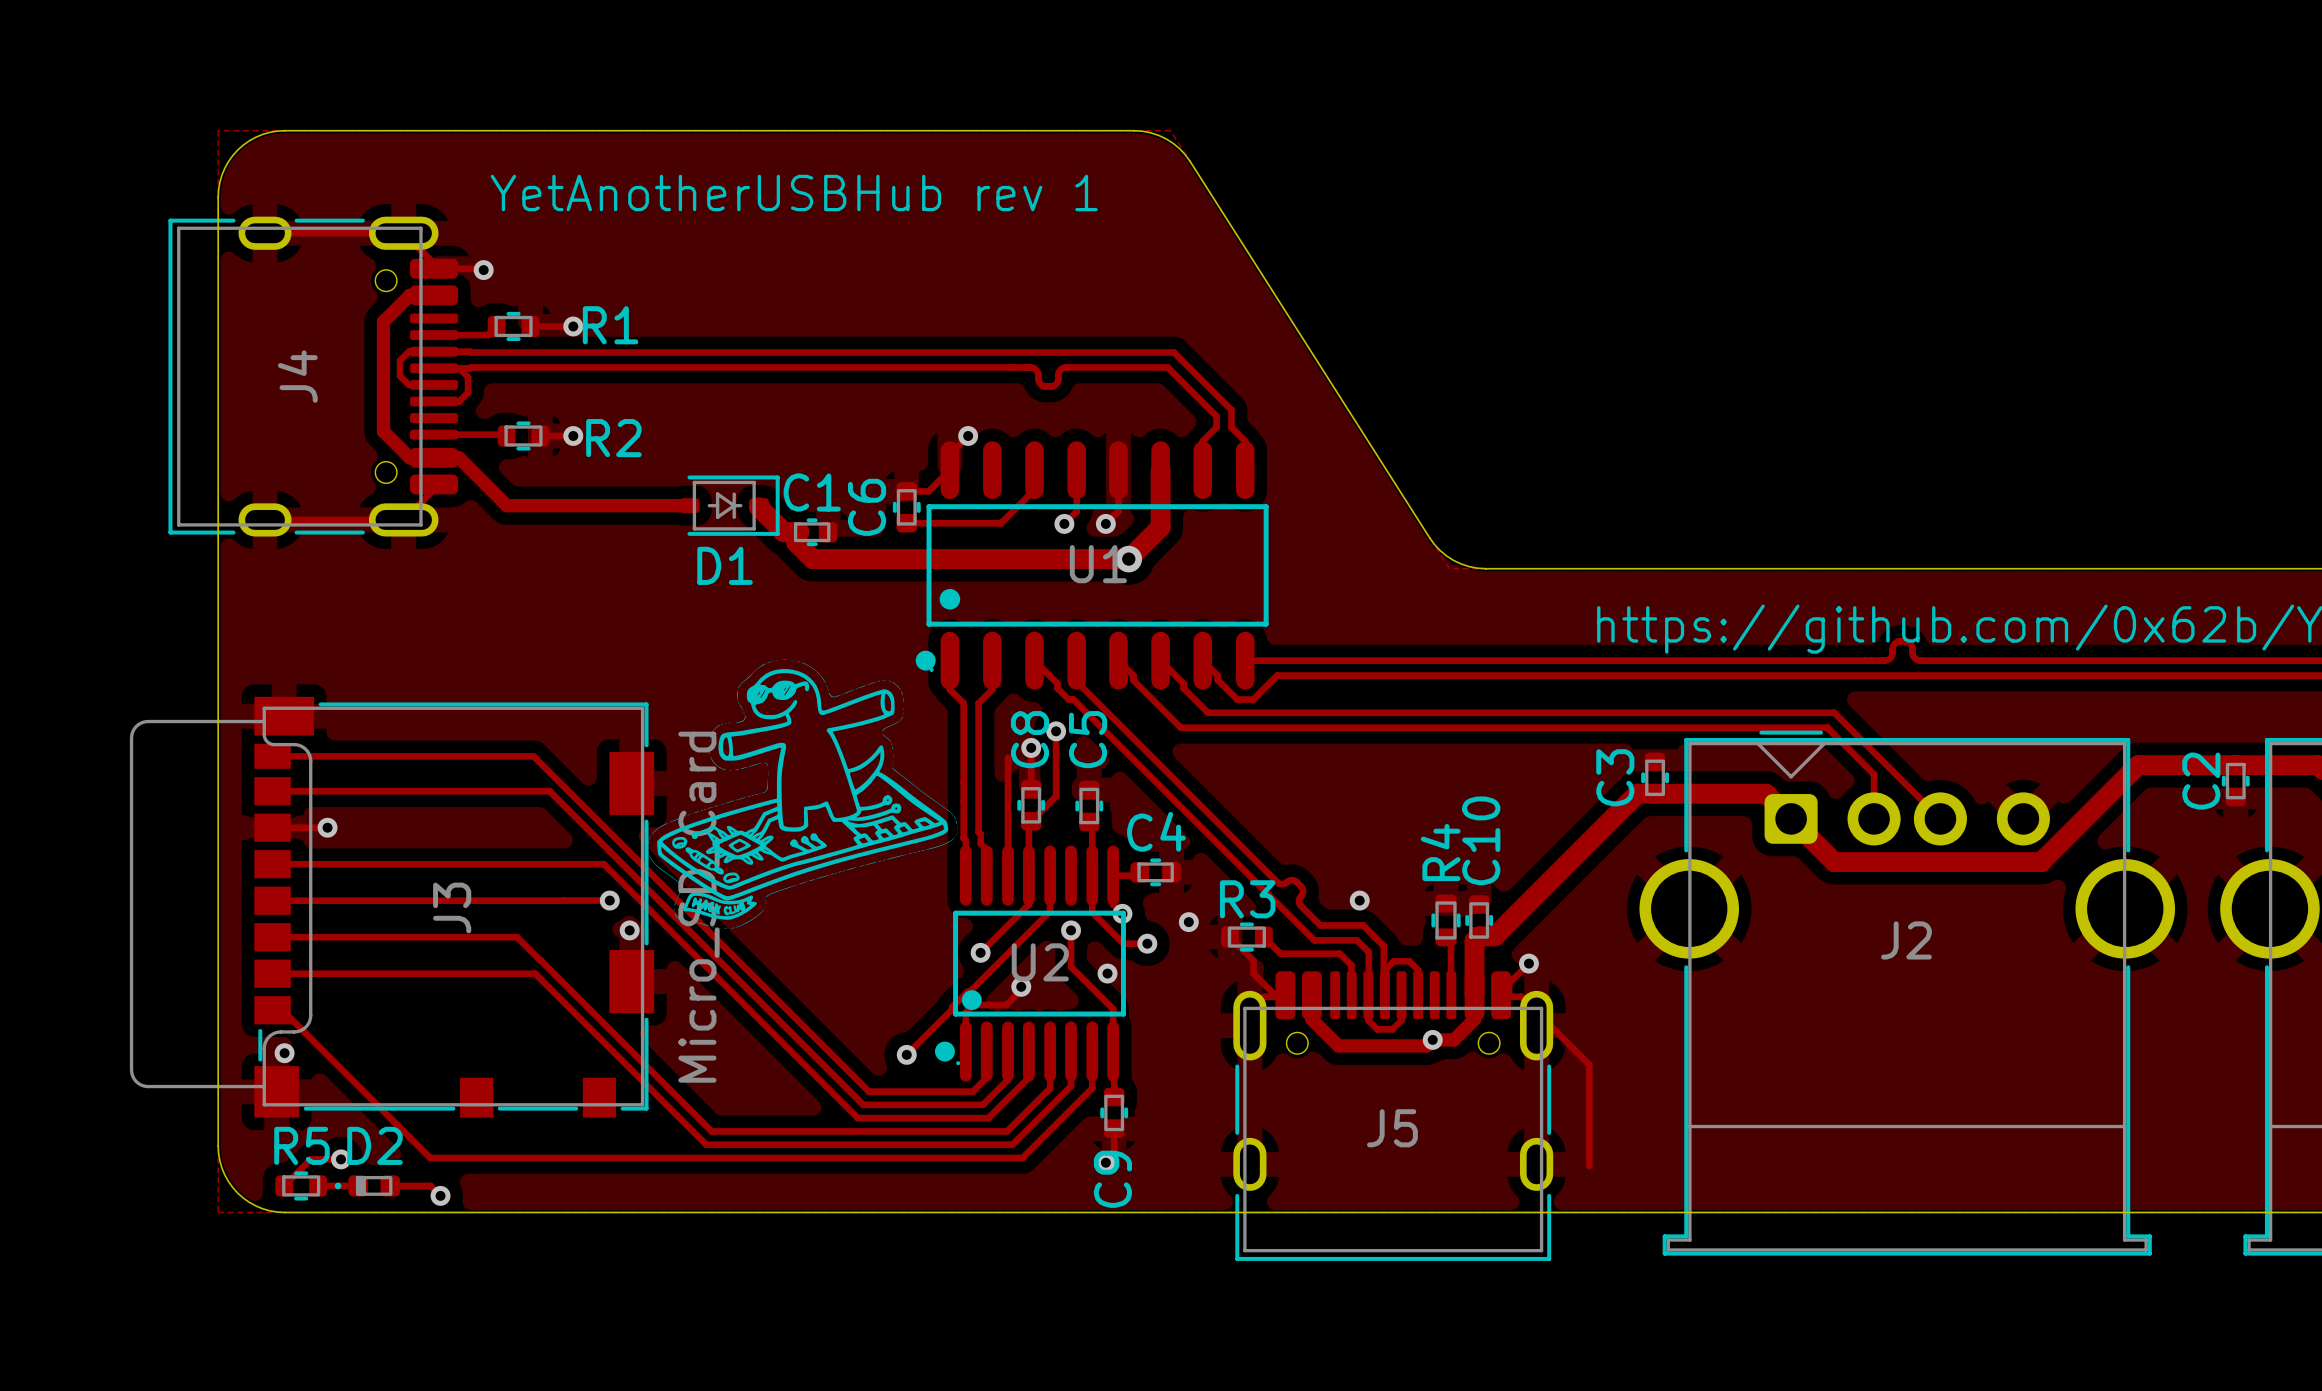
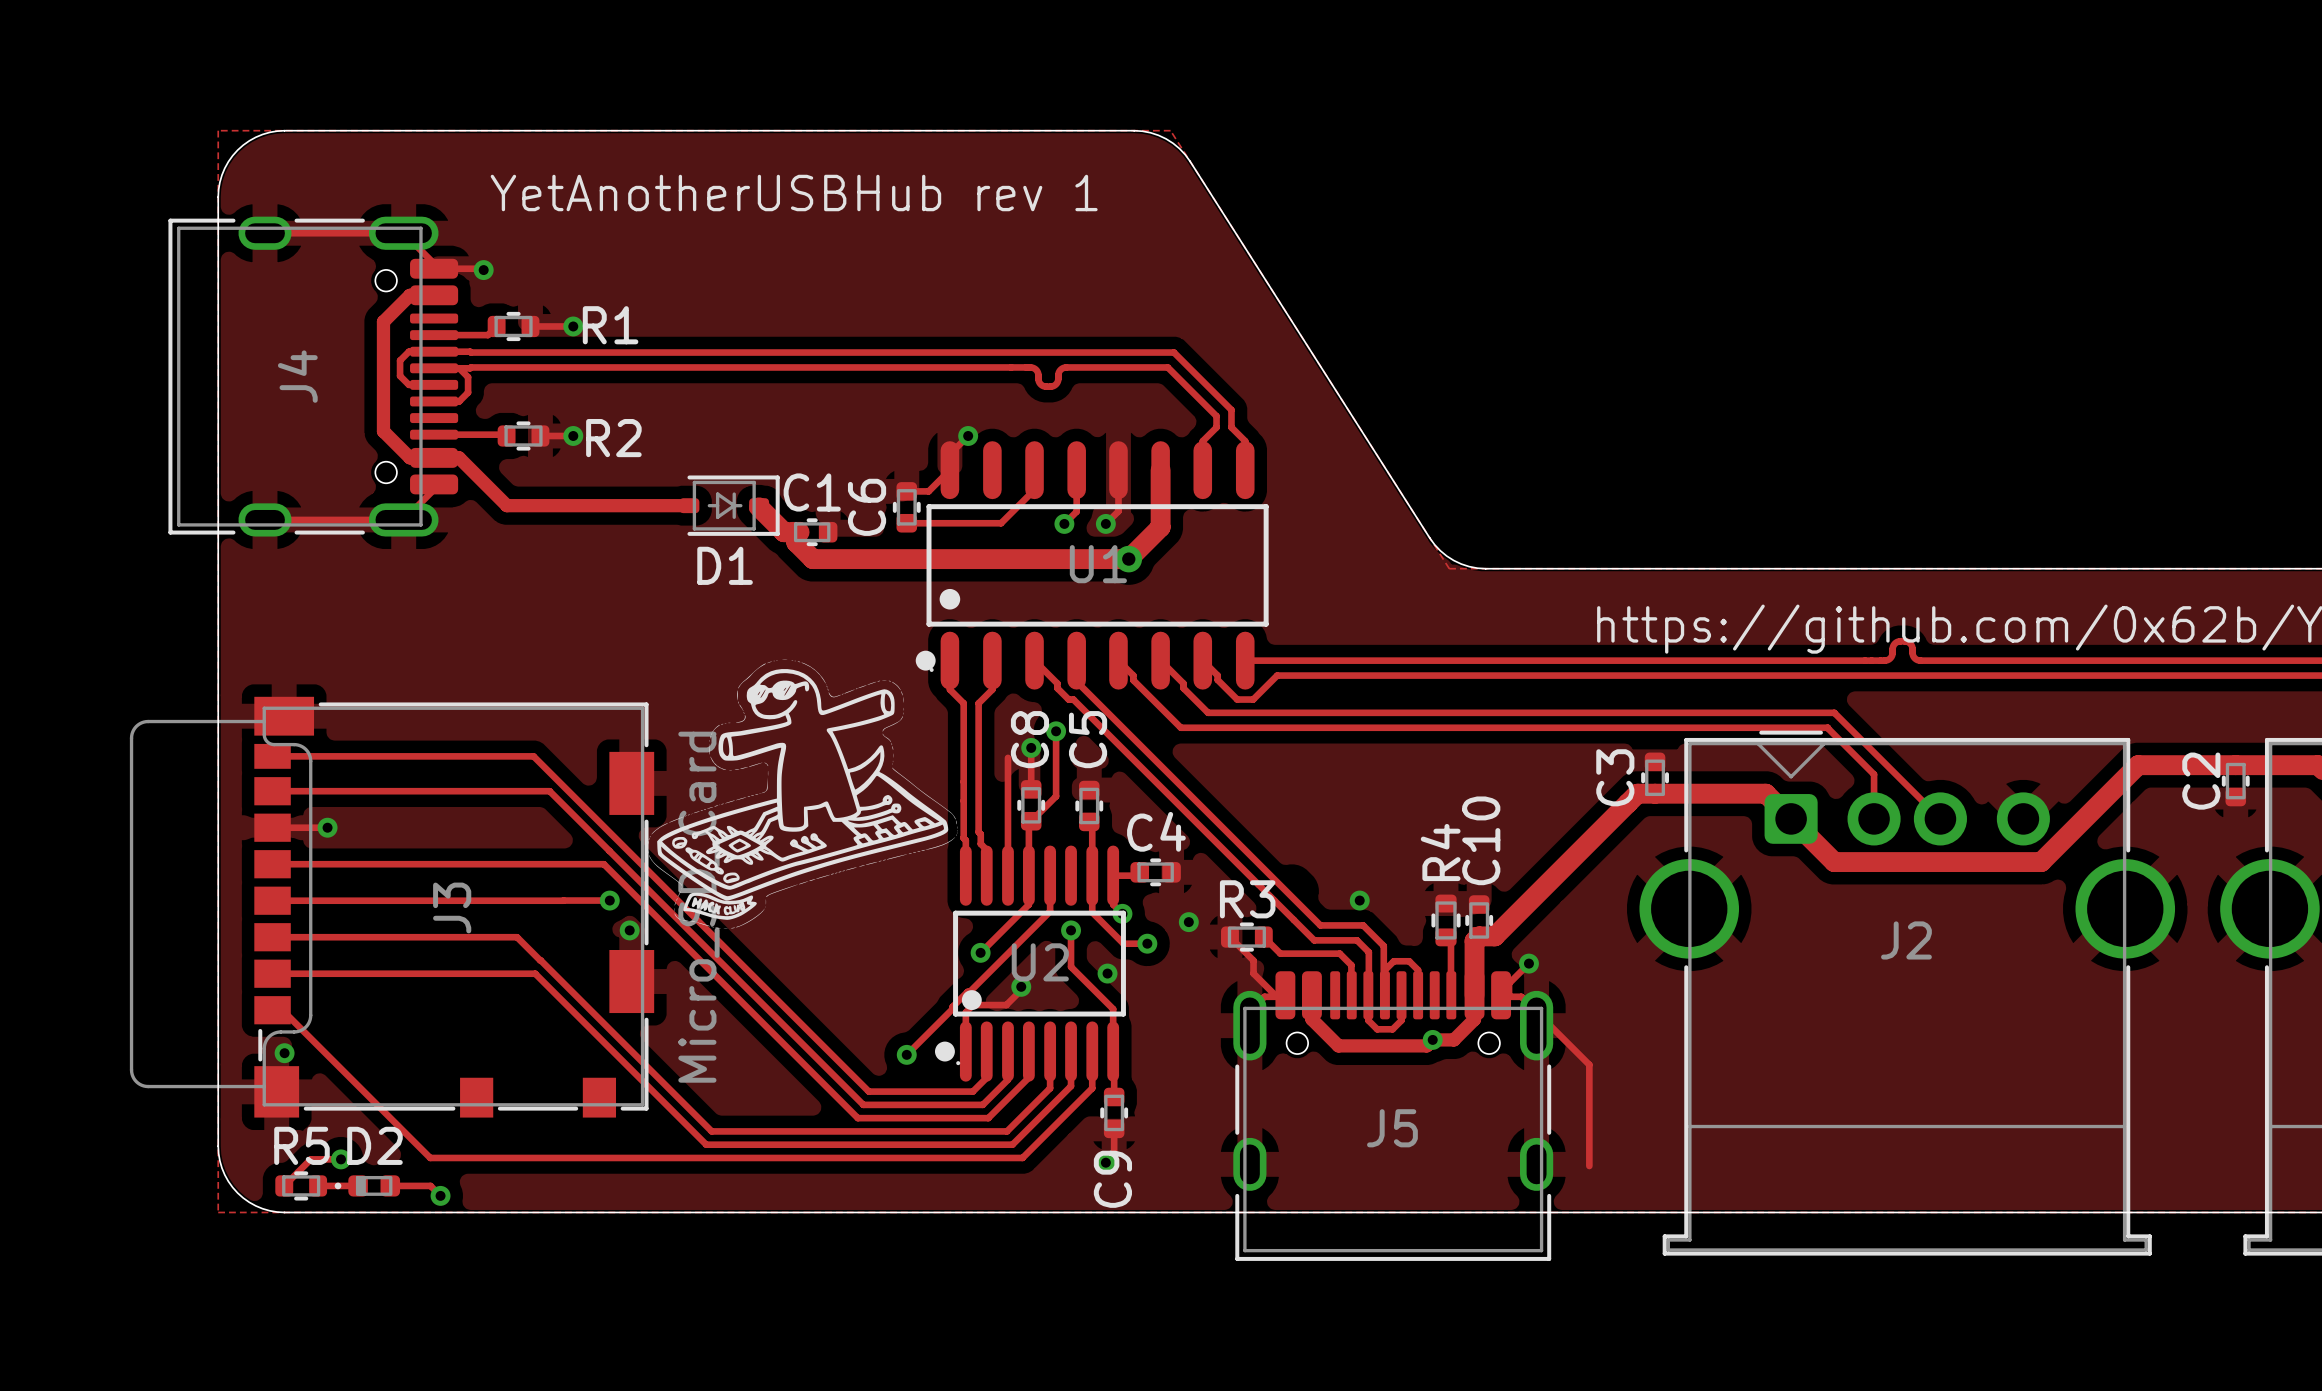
track: (1277, 882) (1283, 884) (1292, 880) (1301, 886) (1303, 892) (1299, 901) (1301, 906) -> (1277, 882) (1301, 906)

